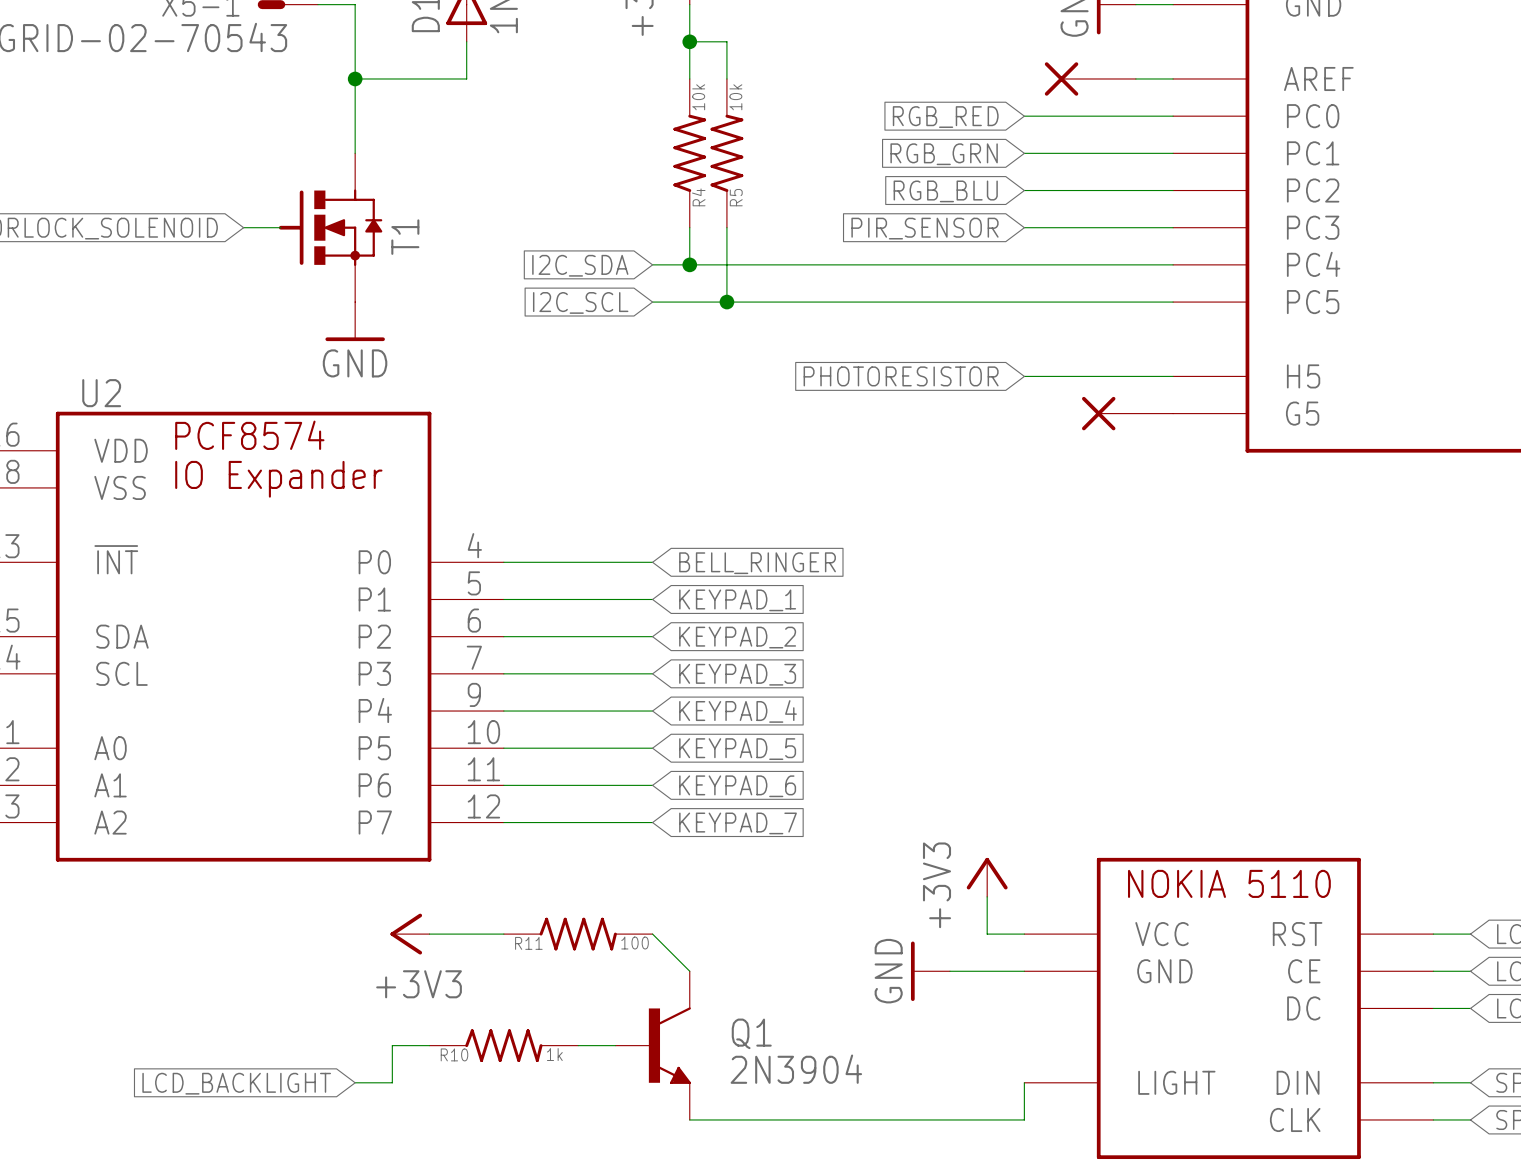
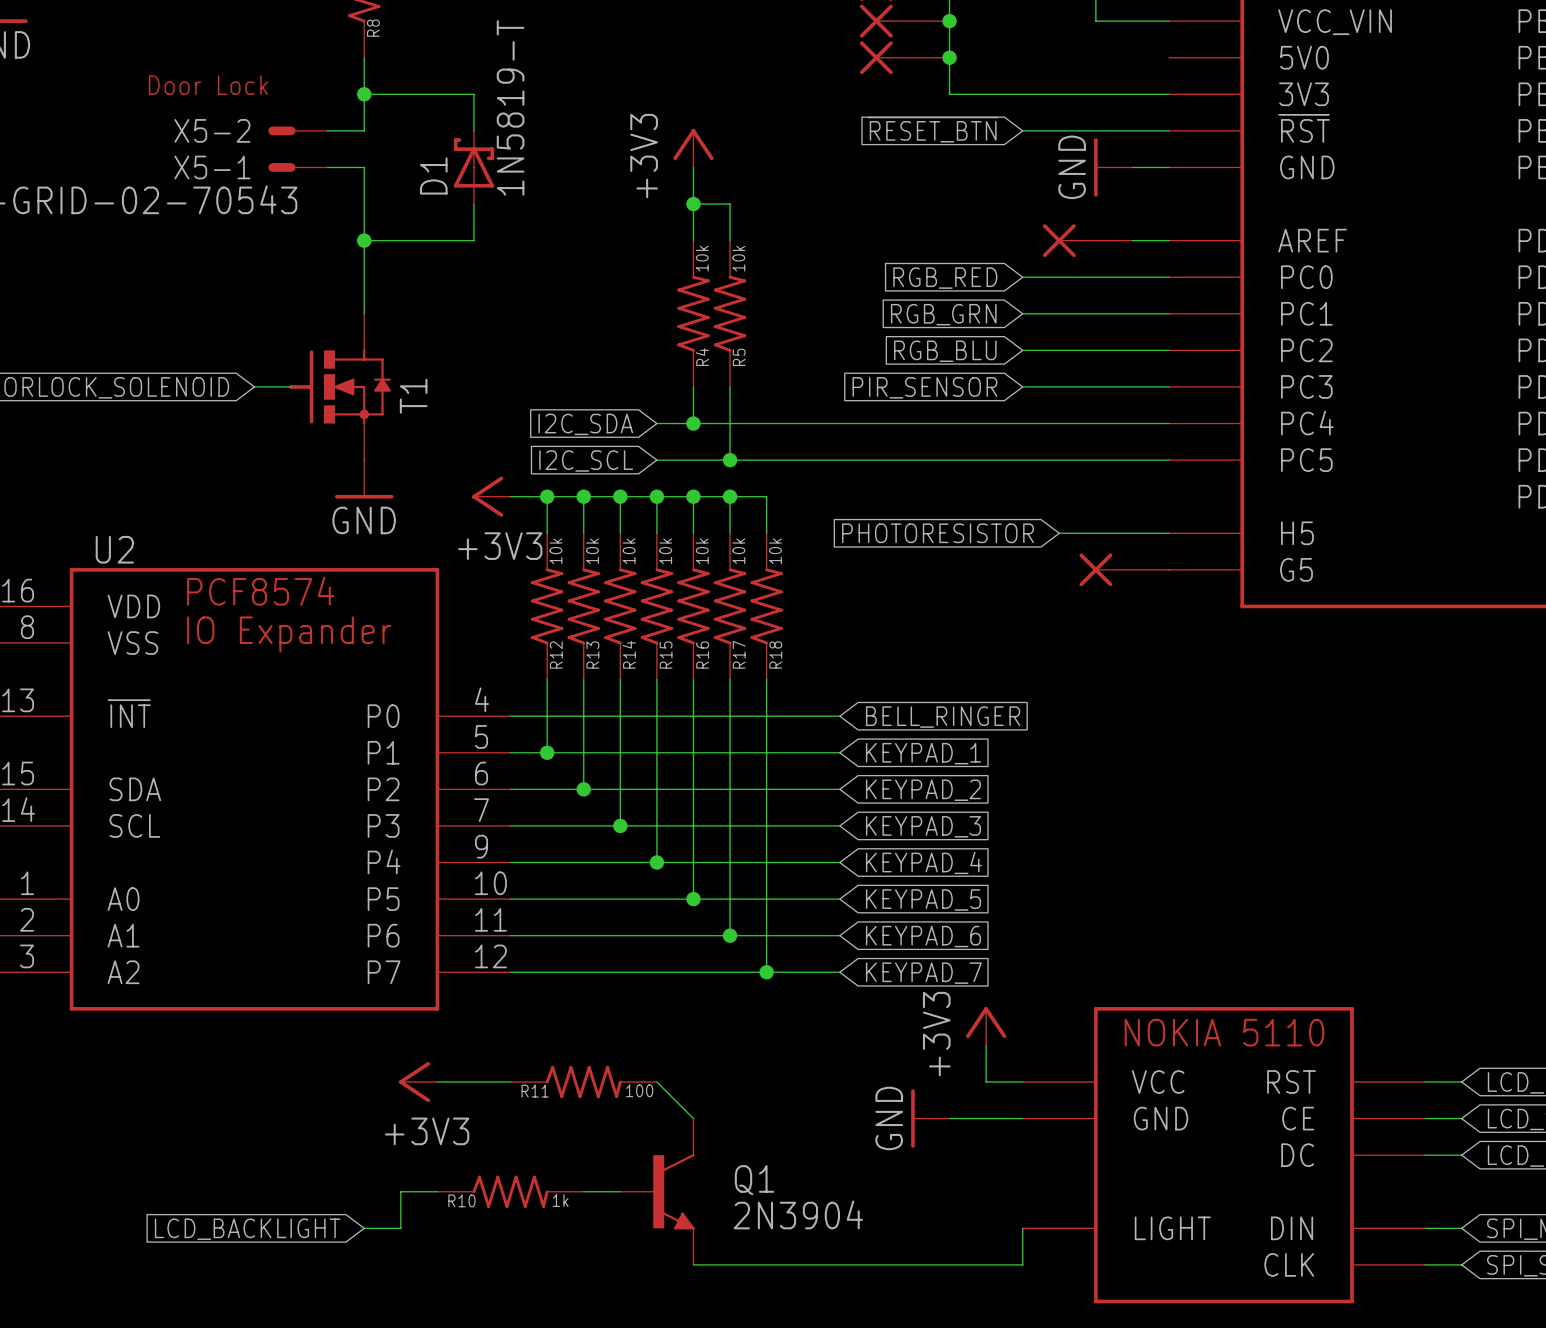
power symbol: none -> +3V3 (491, 496)
wire: none -> (510, 496) (766, 496) (766, 533)
wire: none -> (547, 496) (547, 533)
junction: none -> (547, 496)
wire: none -> (583, 496) (583, 533)
junction: none -> (583, 496)
wire: none -> (620, 496) (620, 533)
junction: none -> (620, 496)
wire: none -> (656, 496) (656, 533)
junction: none -> (656, 496)
wire: none -> (693, 496) (693, 533)
junction: none -> (693, 496)
wire: none -> (730, 496) (730, 533)
junction: none -> (730, 496)
global label position: PHOTORESISTOR (901, 376) -> PHOTORESISTOR (938, 533)
wire: (1024, 376) (1061, 376) -> none
R12: none -> 10k (547, 606)
R13: none -> 10k (583, 606)
R14: none -> 10k (620, 606)
R15: none -> 10k (656, 606)
R16: none -> 10k (693, 606)
R17: none -> 10k (730, 606)
R18: none -> 10k (766, 606)
wire: none -> (547, 679) (547, 752)
wire: none -> (583, 679) (583, 789)
wire: none -> (620, 679) (620, 825)
wire: none -> (656, 679) (656, 862) (839, 862)
wire: none -> (693, 679) (693, 899)
wire: none -> (730, 679) (730, 935)
wire: none -> (766, 679) (766, 972)
wire: none -> (656, 716) (839, 716)
global label position: BELL_RINGER (757, 563) -> BELL_RINGER (943, 717)
junction: none -> (547, 752)
wire: none -> (656, 752) (839, 752)
global label position: KEYPAD_1 (737, 600) -> KEYPAD_1 (923, 753)
junction: none -> (583, 789)
wire: none -> (656, 789) (839, 789)
global label position: KEYPAD_2 (737, 637) -> KEYPAD_2 (923, 790)
junction: none -> (620, 825)
wire: none -> (656, 825) (839, 825)
global label position: KEYPAD_3 (737, 674) -> KEYPAD_3 (923, 826)
junction: none -> (656, 862)
global label position: KEYPAD_4 (738, 711) -> KEYPAD_4 (923, 862)
wire: none -> (656, 899) (839, 899)
junction: none -> (693, 899)
global label position: KEYPAD_5 (737, 749) -> KEYPAD_5 (923, 899)
wire: none -> (656, 935) (839, 935)
junction: none -> (730, 935)
global label position: KEYPAD_6 (737, 786) -> KEYPAD_6 (923, 936)
wire: none -> (656, 972) (839, 972)
junction: none -> (766, 972)
global label position: KEYPAD_7 (738, 823) -> KEYPAD_7 (923, 973)

